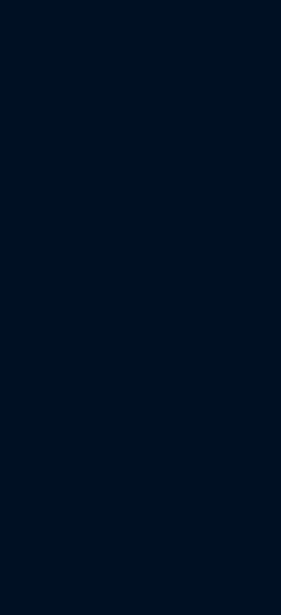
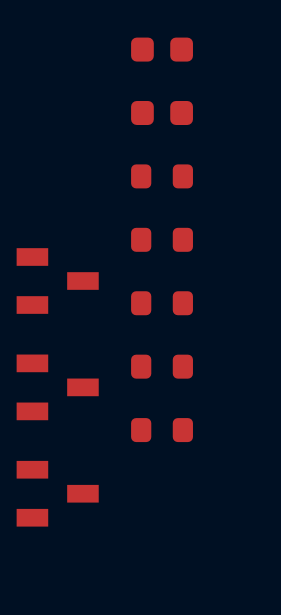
part: none -> (162, 49)
part: none -> (162, 112)
part: none -> (162, 176)
part: none -> (162, 239)
part: none -> (57, 281)
part: none -> (162, 303)
part: none -> (162, 366)
part: none -> (57, 387)
part: none -> (162, 430)
part: none -> (57, 493)

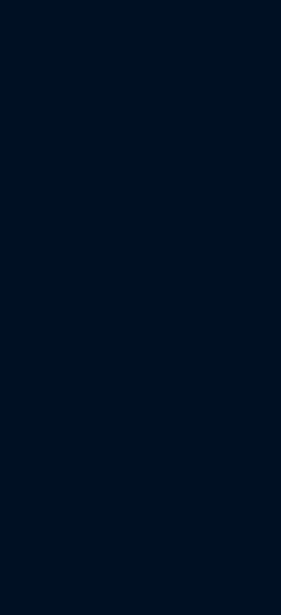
part: (162, 49) -> none
part: (162, 112) -> none
part: (162, 176) -> none
part: (162, 239) -> none
part: (57, 281) -> none
part: (162, 303) -> none
part: (162, 366) -> none
part: (57, 387) -> none
part: (162, 430) -> none
part: (57, 493) -> none

